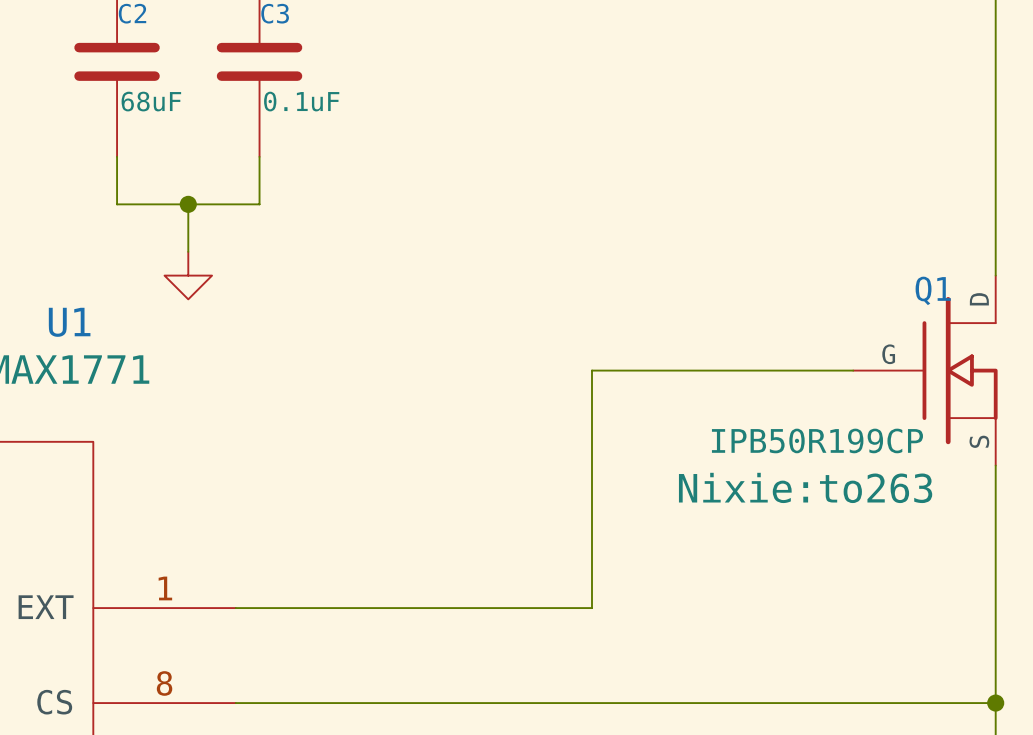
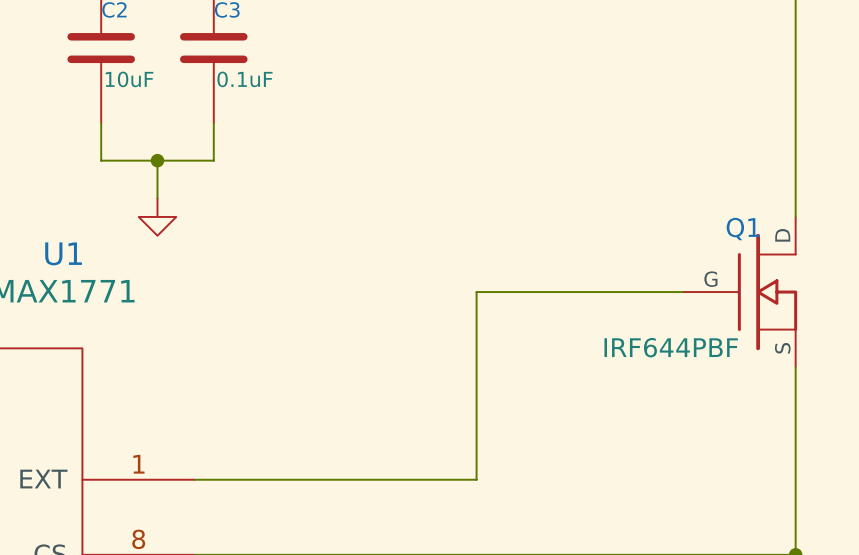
C2 value: 68uF (151, 101) -> 10uF (129, 79)
Q1 value: IPB50R199CP (817, 440) -> IRF644PBF (671, 347)
Q1 text: Nixie:to263 (805, 487) -> none

